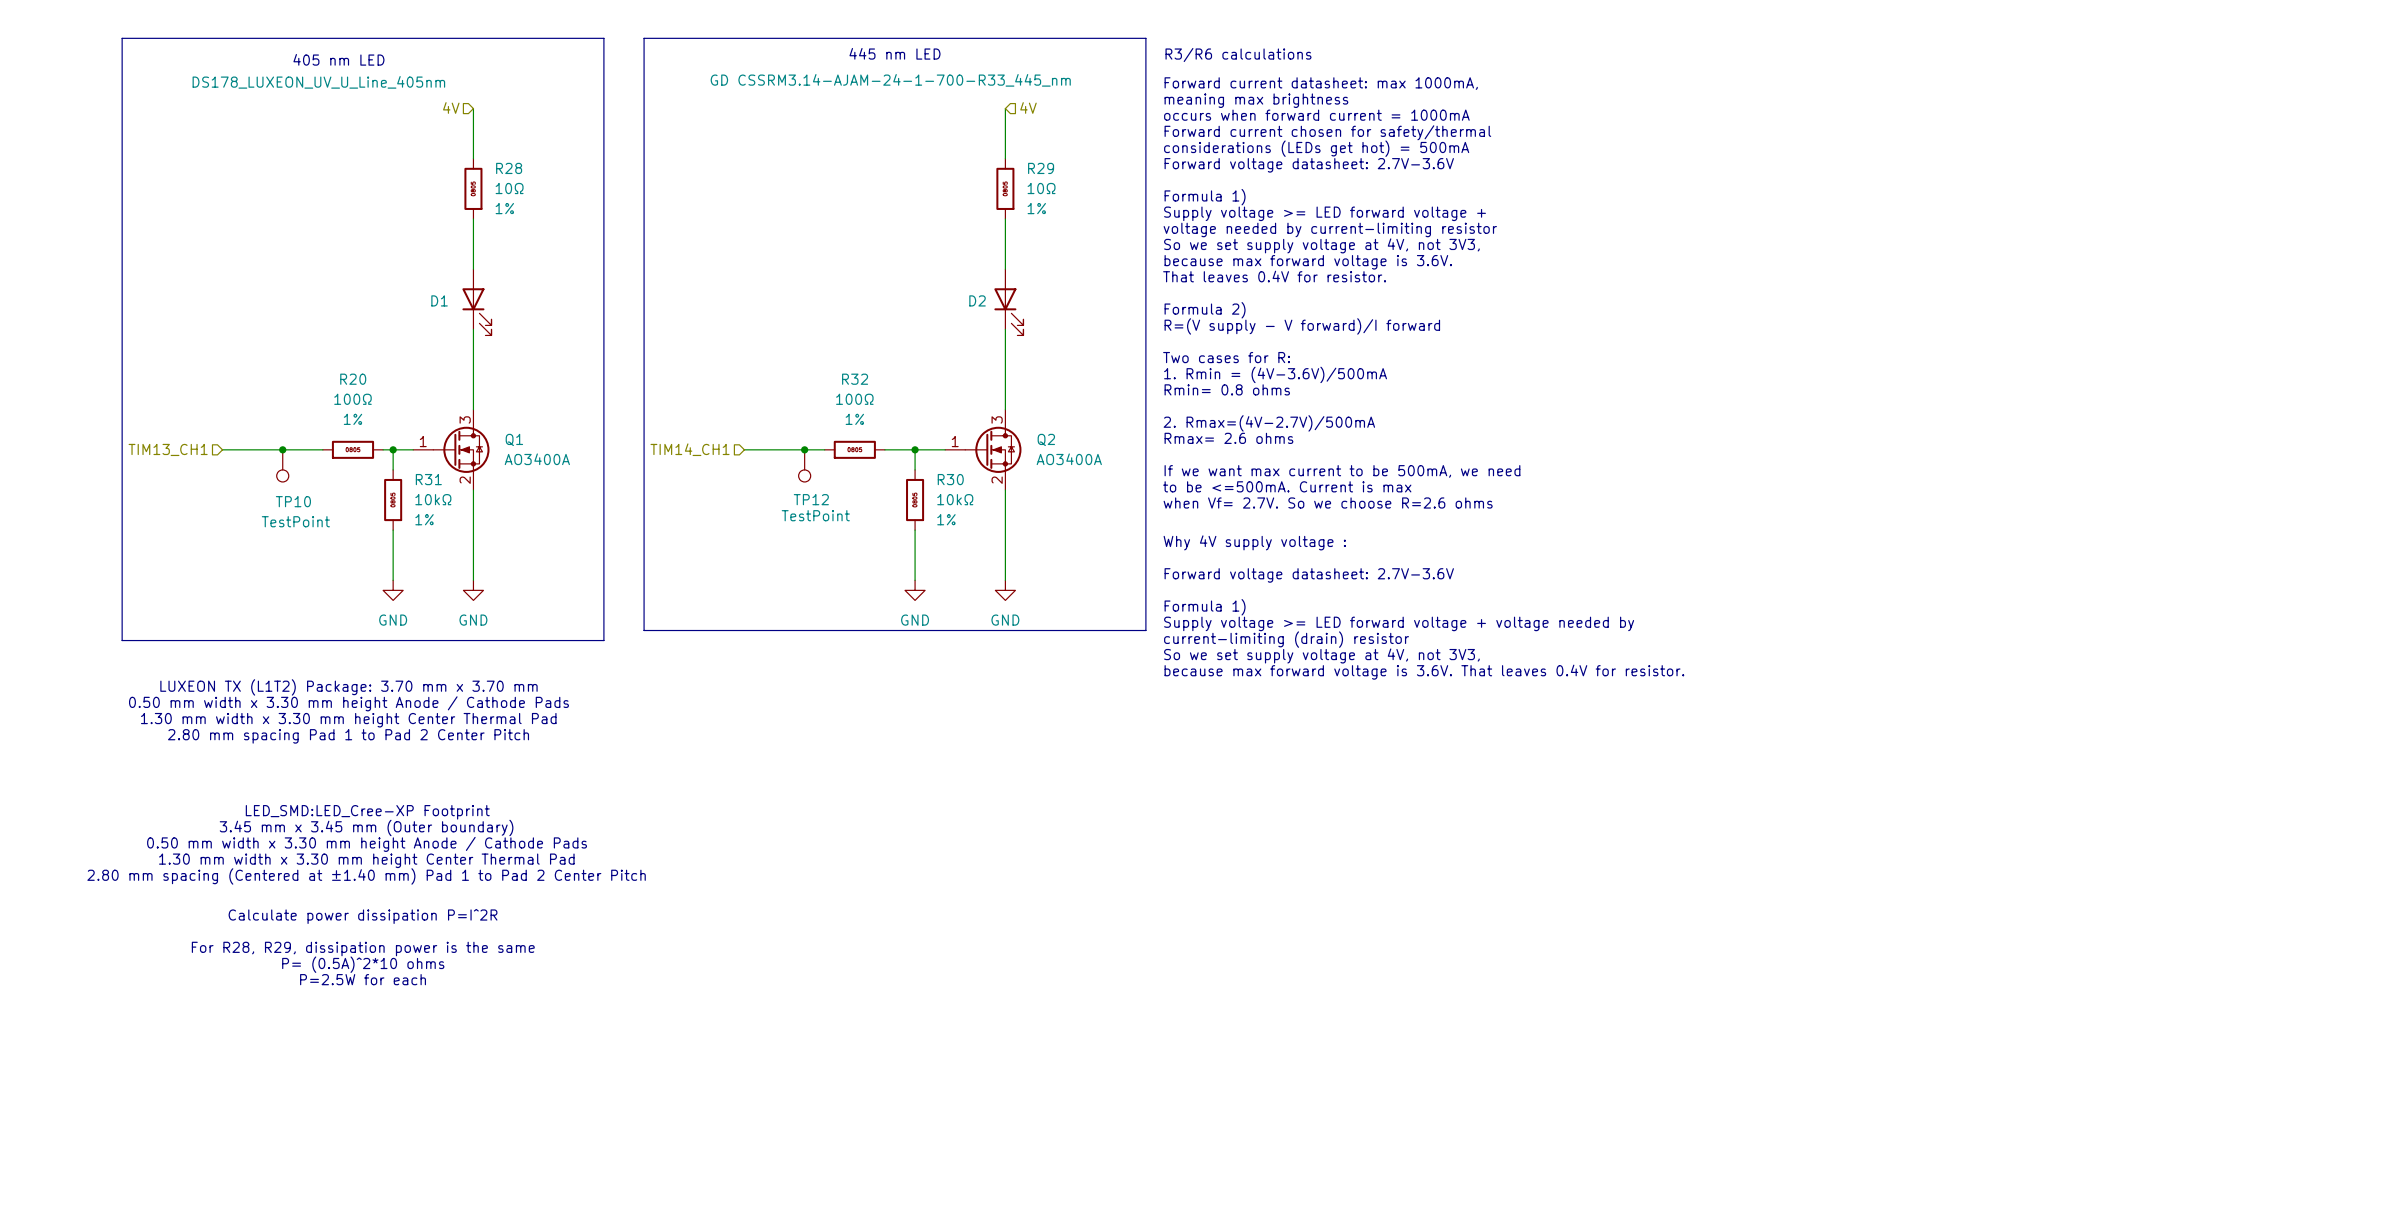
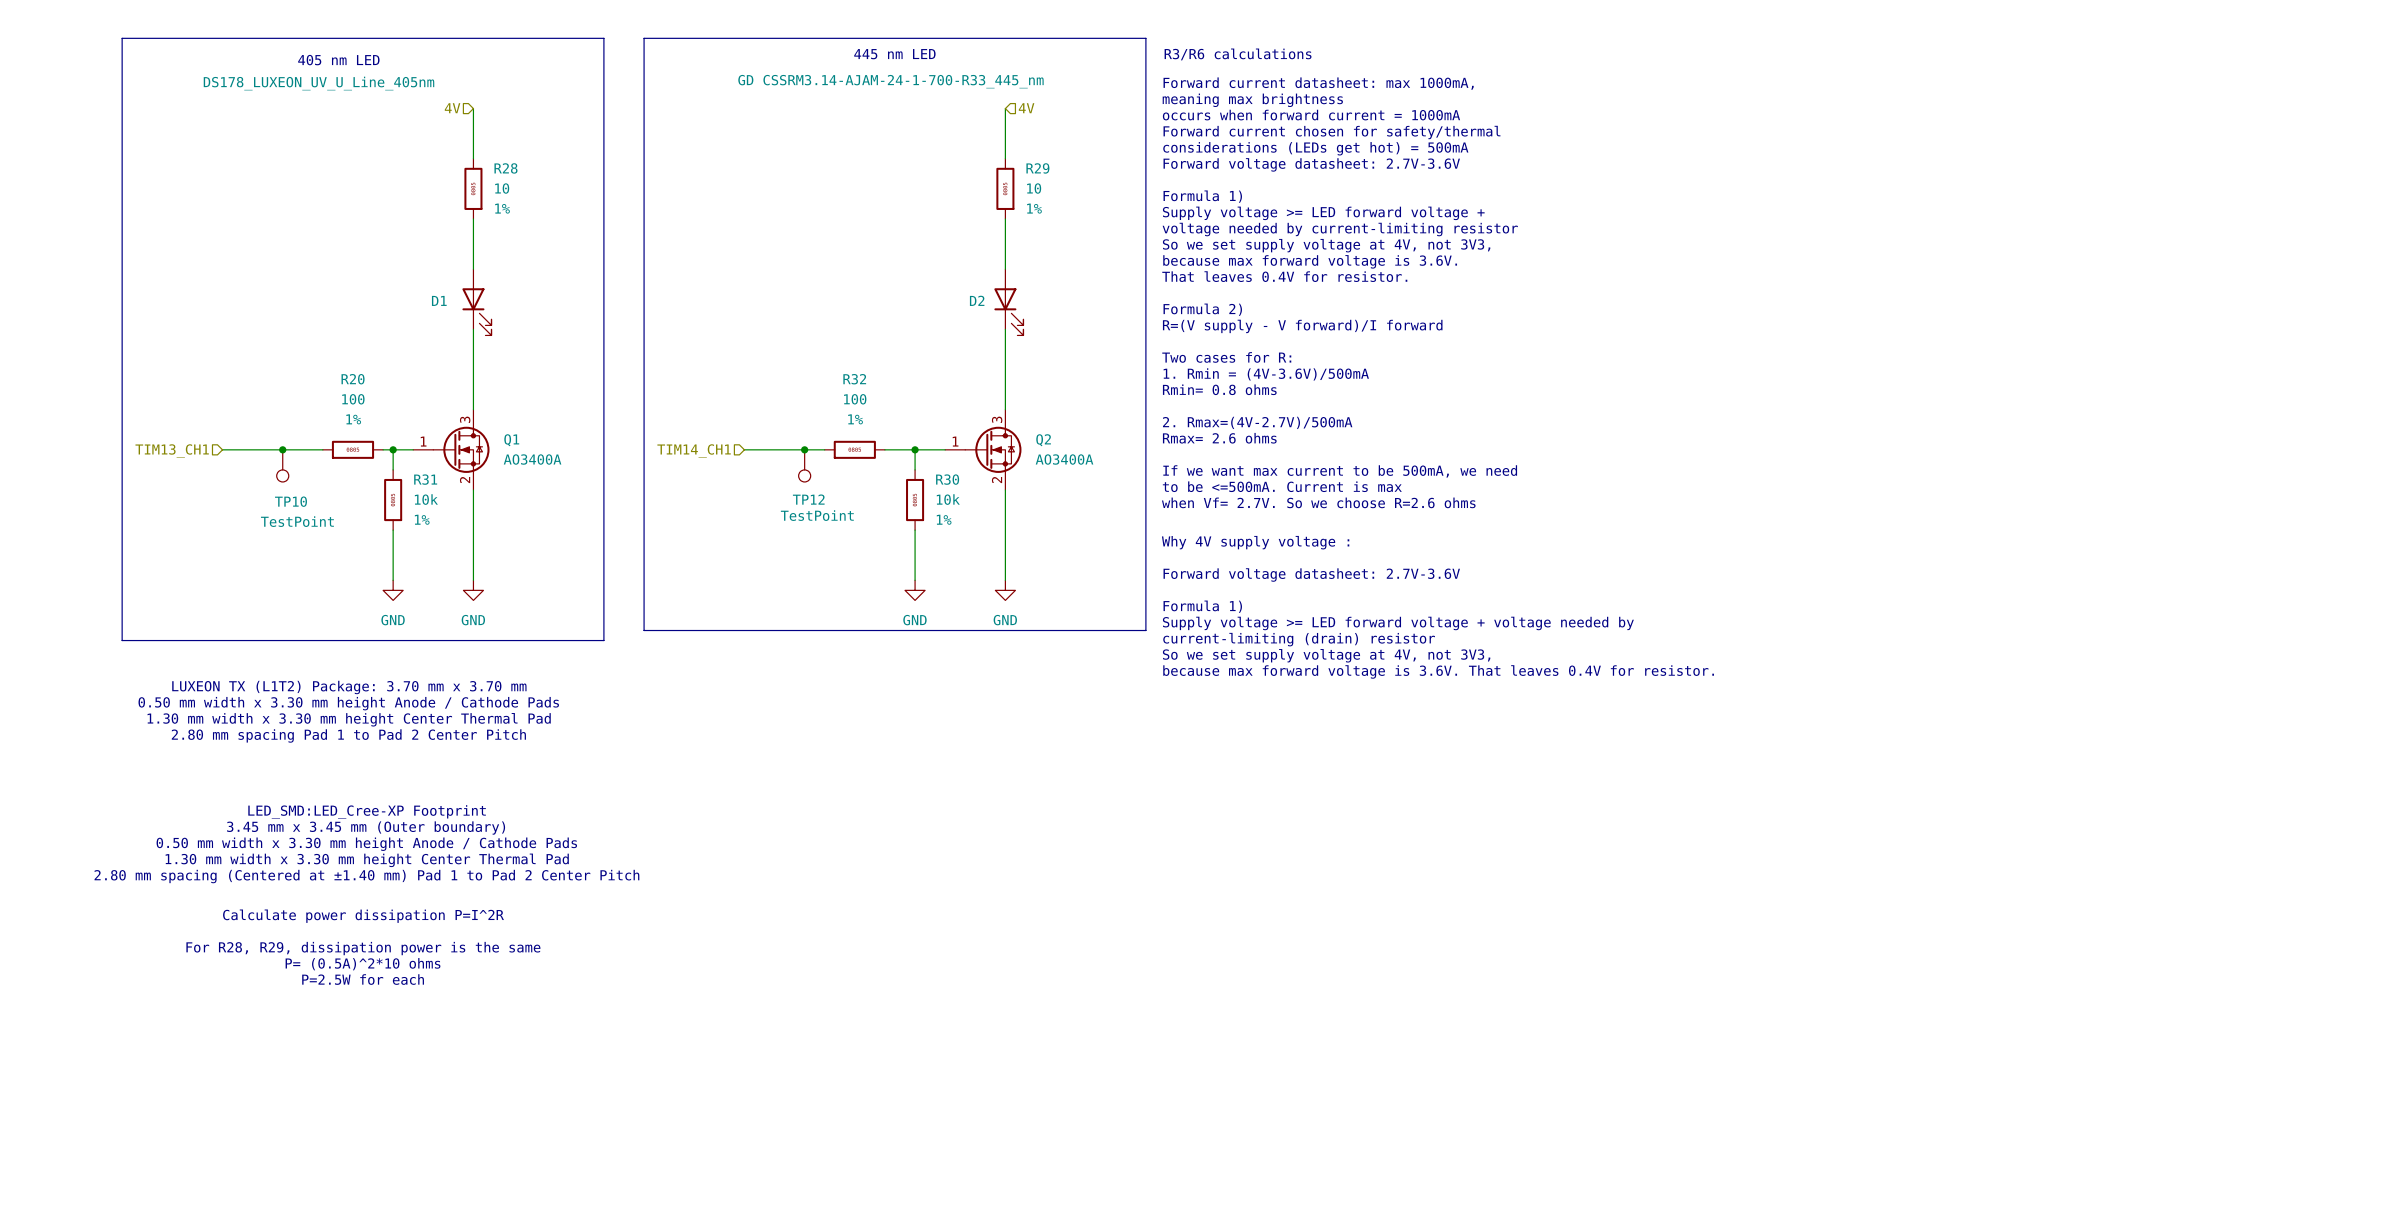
R28 value: 10Ω (509, 188) -> 10 (502, 188)
R29 value: 10Ω (1041, 188) -> 10 (1034, 188)
R20 value: 100Ω (352, 399) -> 100 (353, 399)
R32 value: 100Ω (854, 399) -> 100 (855, 399)
R31 value: 10kΩ (433, 499) -> 10k (426, 499)
R30 value: 10kΩ (955, 499) -> 10k (948, 499)

